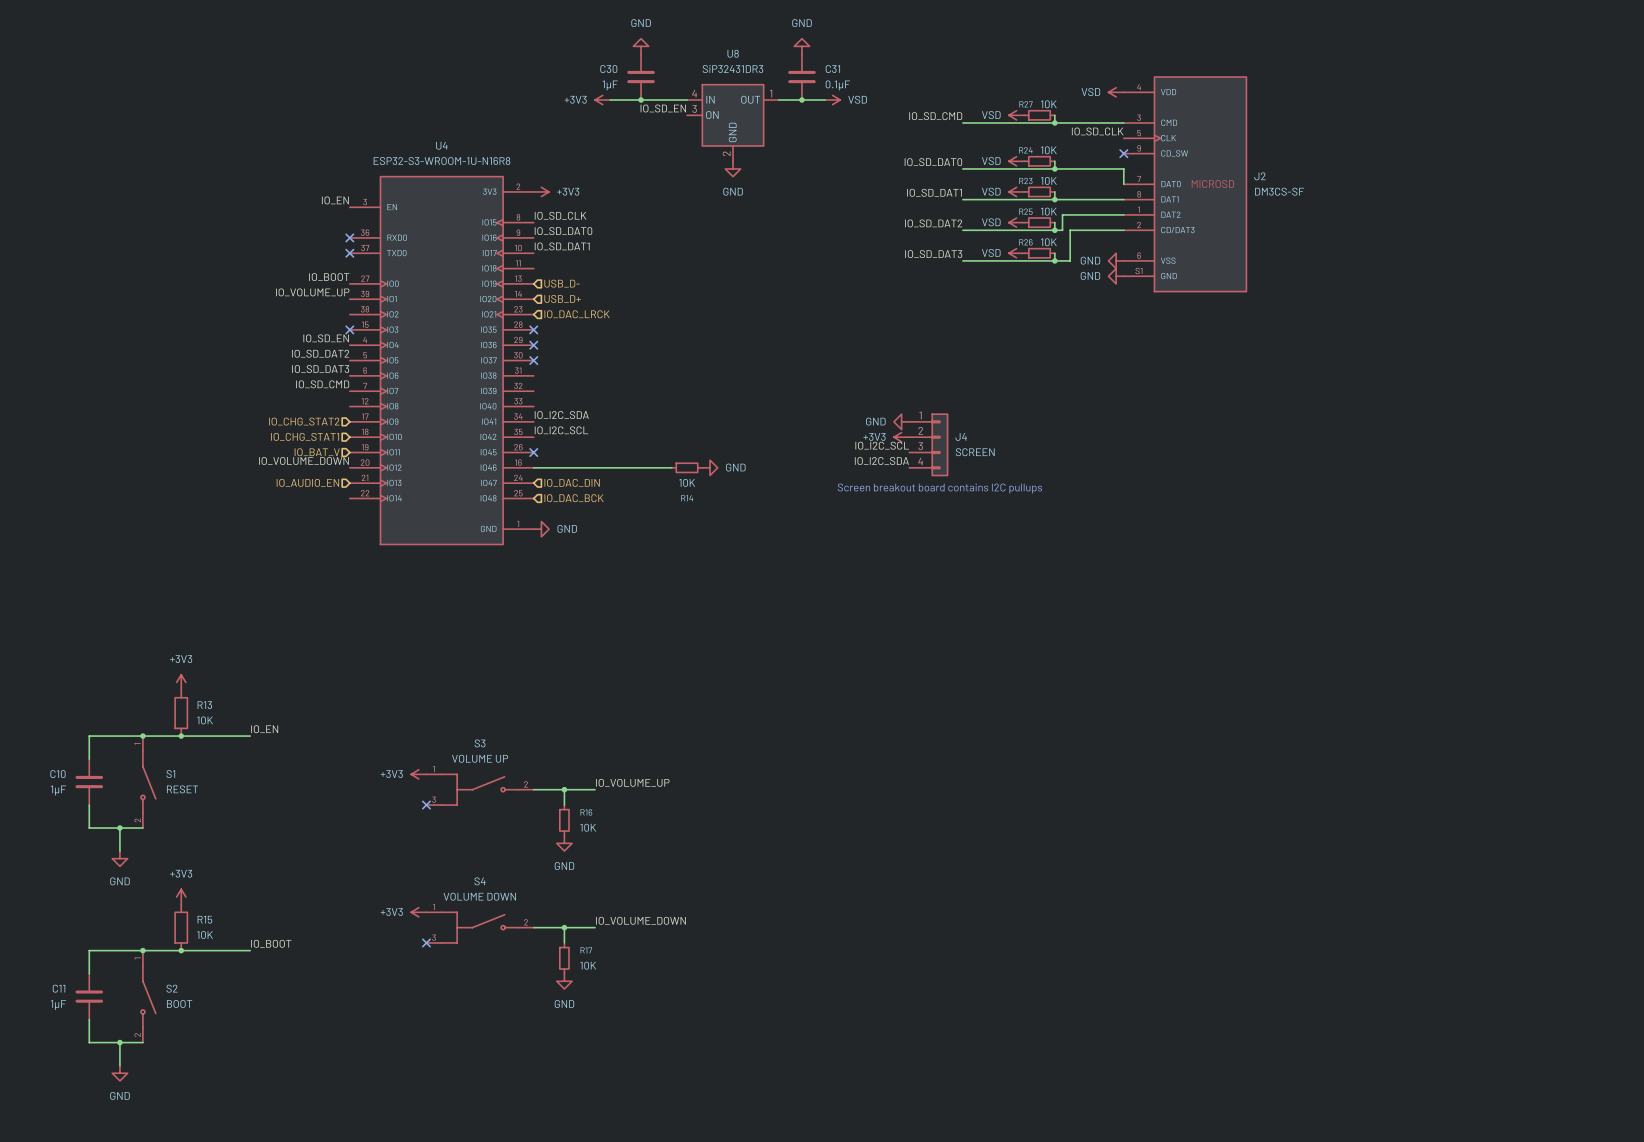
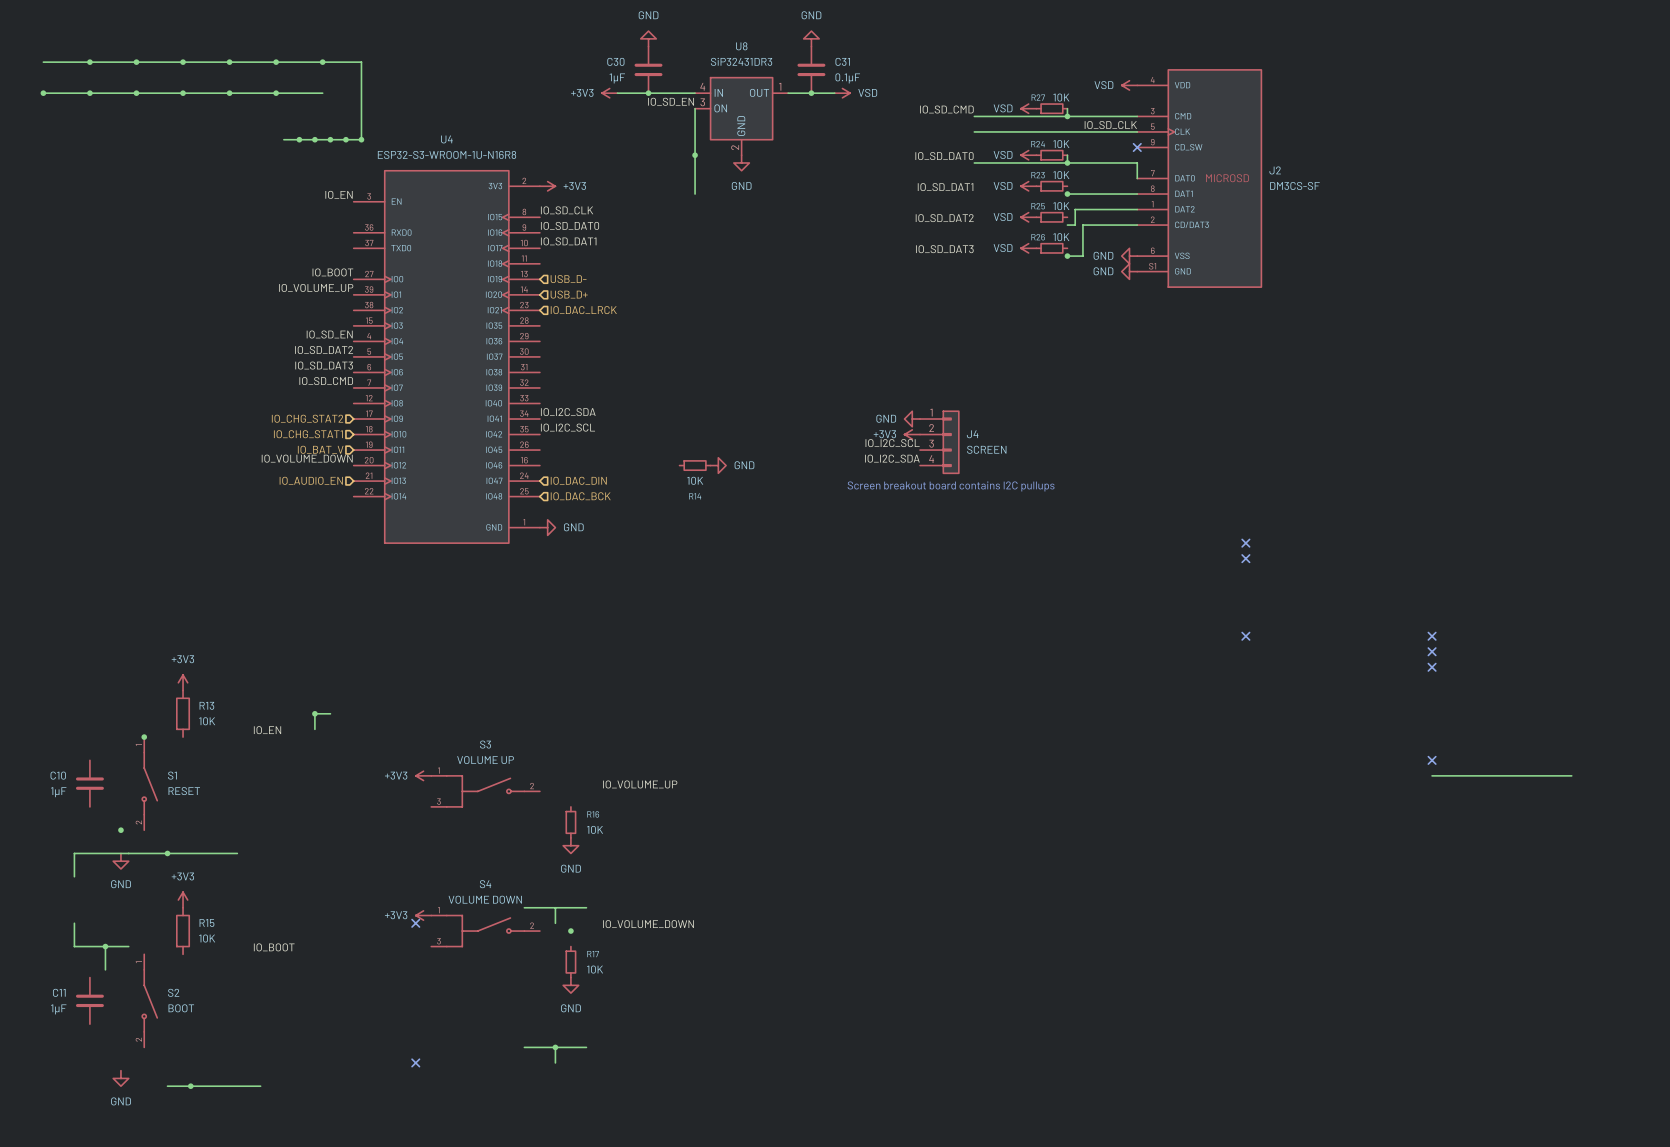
wire: none -> (43, 62) (361, 62) (361, 139) (283, 139)
junction: none -> (89, 62)
junction: none -> (136, 62)
junction: none -> (183, 62)
junction: none -> (229, 62)
junction: none -> (276, 62)
junction: none -> (322, 62)
wire: none -> (43, 93) (322, 93)
junction: none -> (43, 93)
junction: none -> (89, 93)
junction: none -> (136, 93)
junction: none -> (183, 93)
junction: none -> (229, 93)
junction: none -> (276, 93)
wire: none -> (695, 108) (695, 194)
wire: none -> (974, 131) (1137, 131)
junction: none -> (299, 139)
junction: none -> (314, 139)
junction: none -> (330, 139)
junction: none -> (345, 139)
junction: none -> (361, 139)
junction: none -> (695, 155)
wire: (1054, 191) (1054, 199) (962, 199) -> none
wire: (1054, 222) (1054, 230) (962, 230) -> none
junction: (1054, 230) -> none
no-connect mark: (349, 237) -> none
no-connect mark: (349, 253) -> none
wire: (1054, 253) (1054, 260) (962, 260) -> none
no-connect mark: (349, 329) -> none
no-connect mark: (533, 329) -> none
no-connect mark: (533, 345) -> none
no-connect mark: (533, 360) -> none
no-connect mark: (533, 452) -> none
wire: (533, 467) (671, 467) -> none
no-connect mark: none -> (1245, 543)
no-connect mark: none -> (1245, 558)
no-connect mark: none -> (1245, 636)
no-connect mark: none -> (1432, 636)
no-connect mark: none -> (1432, 651)
no-connect mark: none -> (1432, 667)
junction: none -> (314, 713)
wire: none -> (330, 713) (314, 713) (314, 729)
junction: (181, 736) -> none
wire: (250, 736) (89, 736) (89, 759) -> (237, 853) (74, 853) (74, 876)
no-connect mark: none -> (1432, 760)
wire: none -> (1432, 775) (1571, 775)
wire: (533, 789) (595, 789) -> (524, 907) (586, 907)
wire: (564, 789) (564, 805) -> (555, 907) (555, 923)
junction: (564, 789) -> none
wire: (89, 805) (89, 828) (142, 828) -> (74, 923) (74, 946) (128, 946)
no-connect mark: (426, 805) -> none
wire: (119, 828) (119, 851) -> (105, 946) (105, 969)
junction: none -> (167, 853)
wire: (533, 927) (595, 927) -> (524, 1047) (586, 1047)
wire: (564, 927) (564, 942) -> (555, 1047) (555, 1062)
junction: none -> (105, 946)
no-connect mark position: (426, 942) -> (415, 923)
junction: (142, 950) -> none
junction: (181, 950) -> none
wire: (250, 950) (89, 950) (89, 973) -> none
wire: (89, 1019) (89, 1042) (142, 1042) -> none
wire: (119, 1042) (119, 1065) -> none
junction: (119, 1042) -> none
junction: none -> (555, 1047)
no-connect mark: none -> (415, 1062)
wire: none -> (167, 1086) (260, 1086)
junction: none -> (190, 1086)

